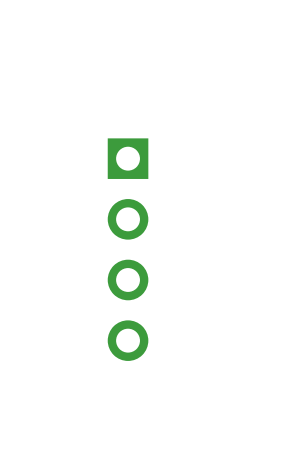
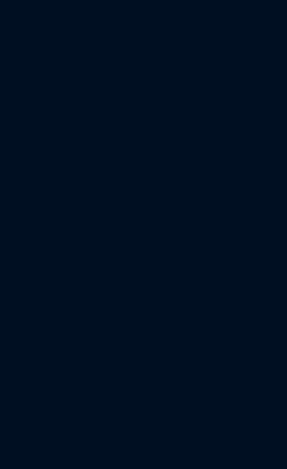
part: (128, 249) -> none

